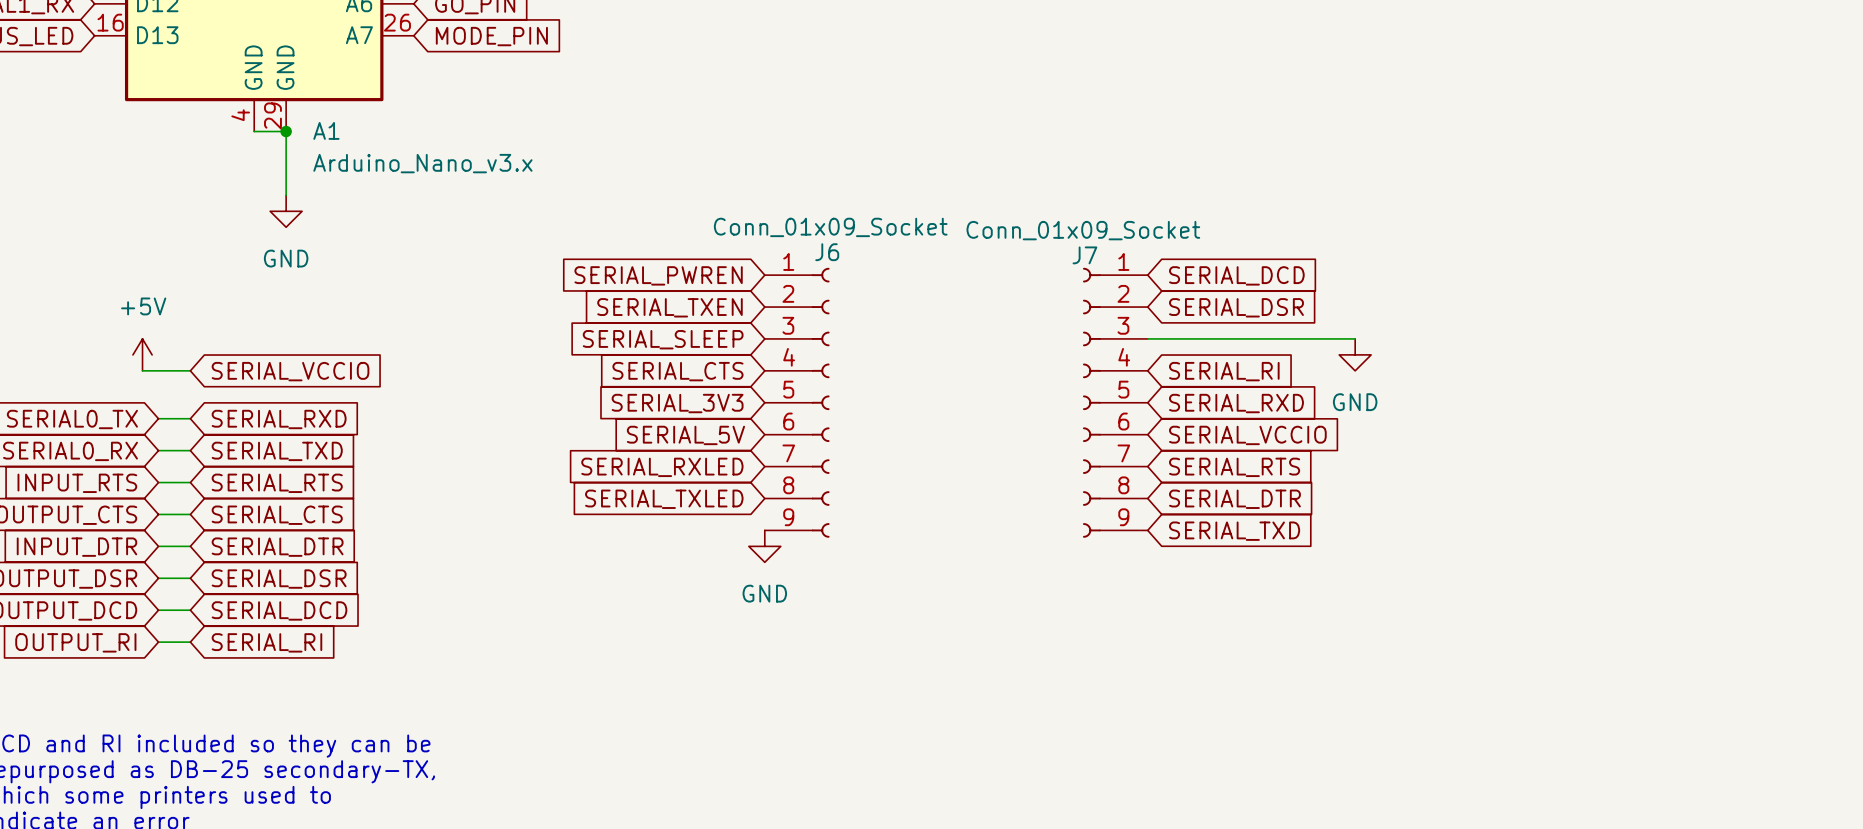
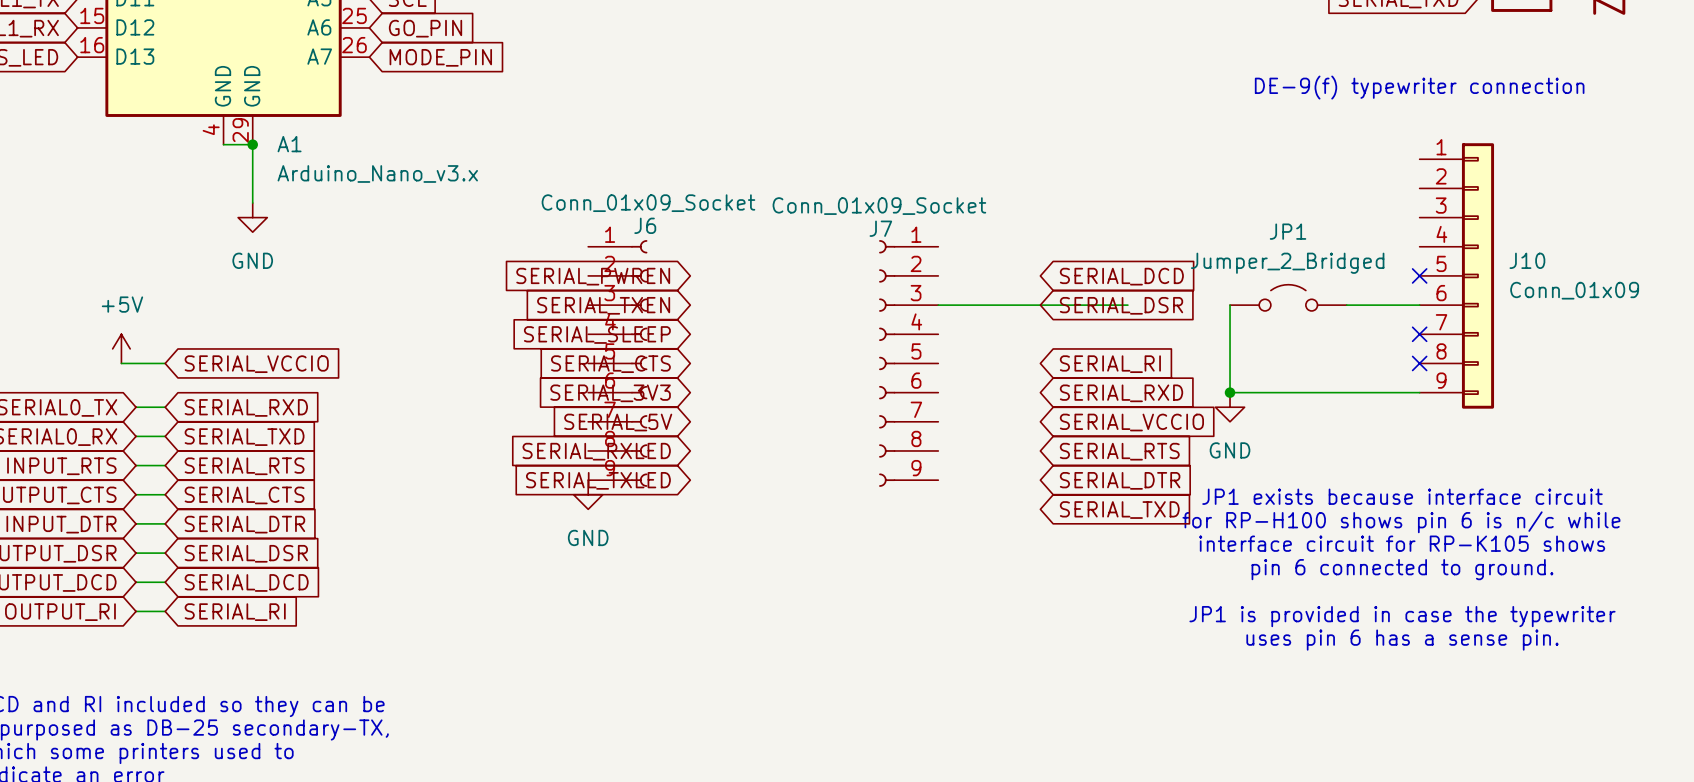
text: none -> DE-9(f) typewriter connection (1419, 87)
no-connect mark: none -> (1419, 275)
J10: none -> Conn_01x09 (1456, 275)
JP1: none -> Jumper_2_Bridged (1288, 297)
wire: none -> (1230, 305) (1230, 392) (1419, 392)
wire: none -> (1346, 305) (1419, 305)
wire: (1147, 338) (1355, 338) -> (938, 305) (1127, 305)
no-connect mark: none -> (1419, 334)
power symbol position: GND (1355, 354) -> GND (1230, 407)
no-connect mark: none -> (1419, 363)
J6 position: (797, 402) -> (617, 363)
J7 position: (1115, 402) -> (908, 363)
junction: none -> (1230, 392)
text: none -> JP1 exists because interface circuit (1402, 496)
text: none -> for RP-H100 shows pin 6 is n/c while (1401, 522)
power symbol position: GND (764, 546) -> GND (588, 494)
text: none -> interface circuit for RP-K105 shows (1402, 543)
text: none -> pin 6 connected to ground. (1402, 569)
text: none -> JP1 is provided in case the typewriter (1402, 616)
text: none -> uses pin 6 has a sense pin. (1402, 640)

